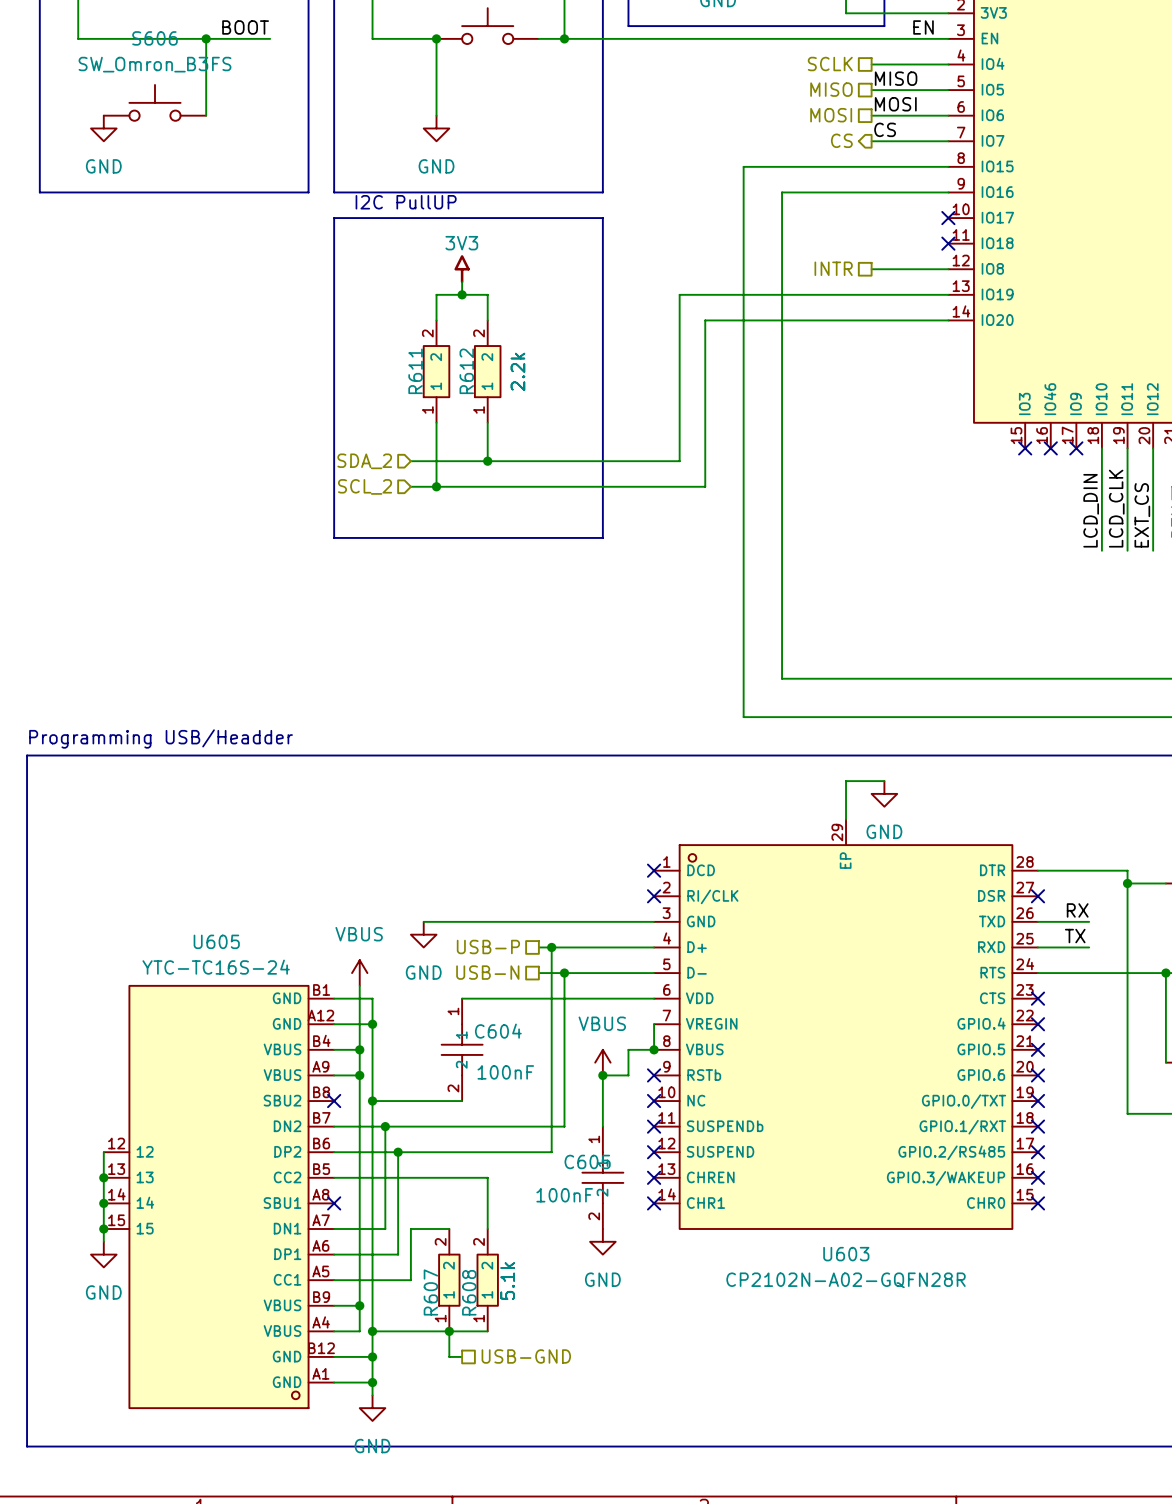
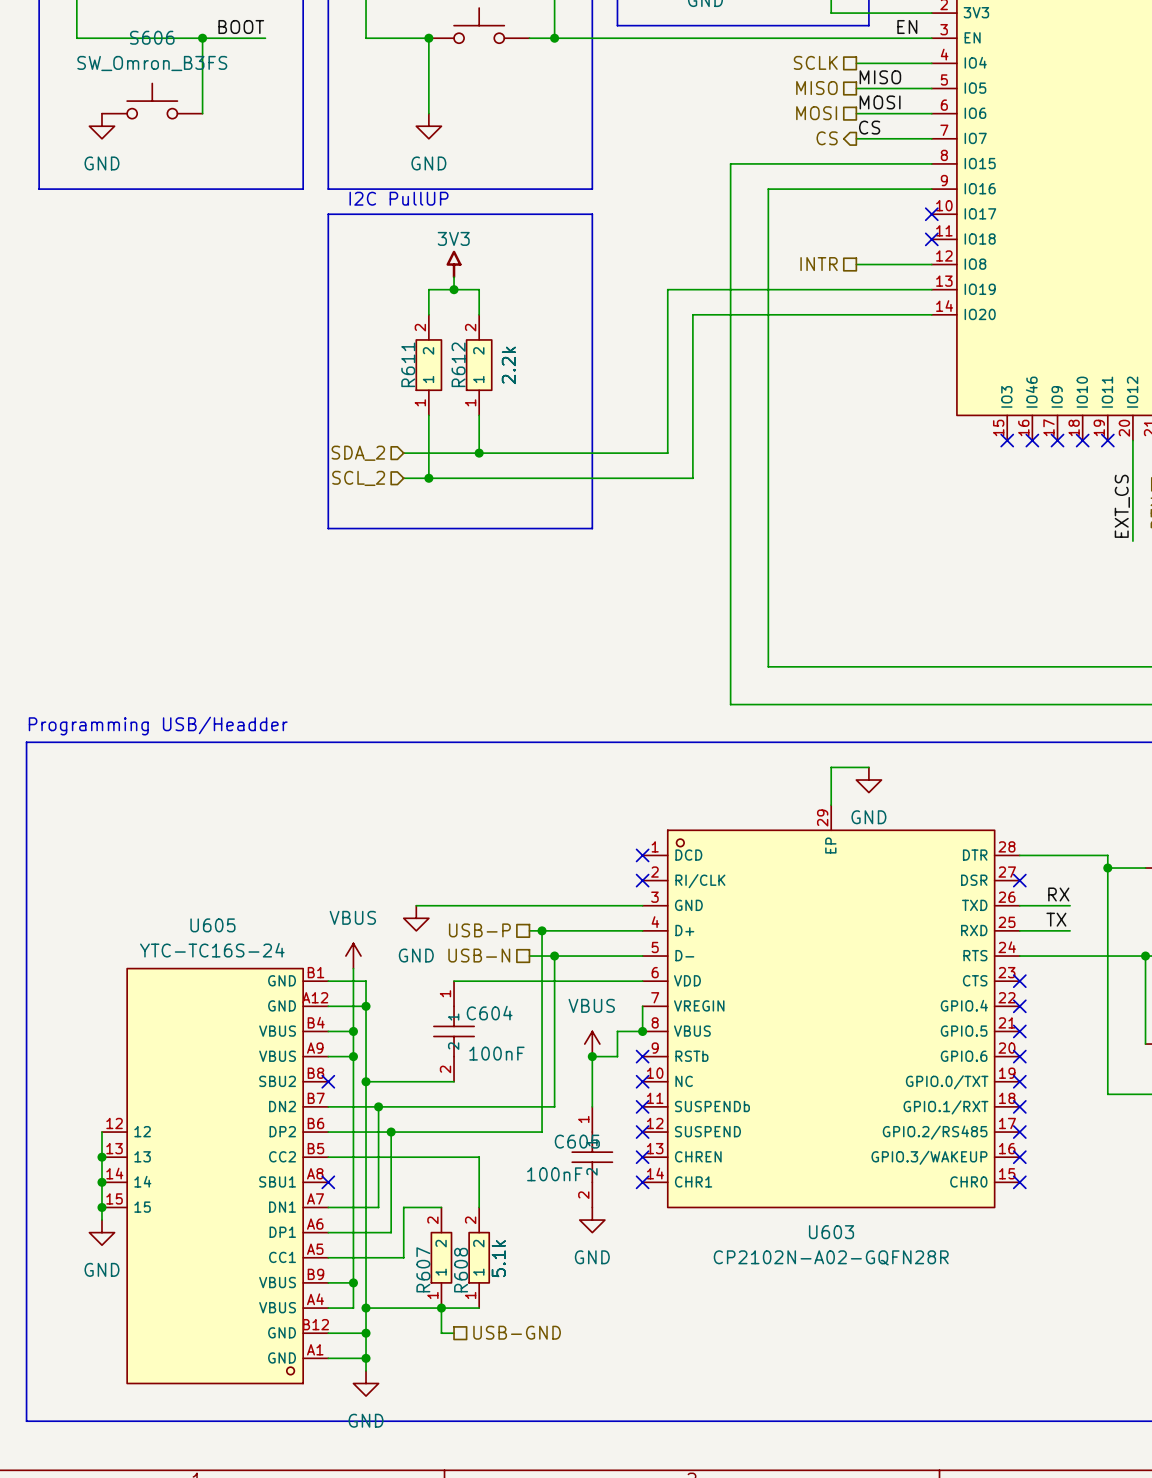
wire: (1101, 448) (1101, 550) -> none
no-connect mark: none -> (1082, 440)
wire: (1127, 448) (1127, 550) -> none
no-connect mark: none -> (1107, 440)
label: LCD_CLK (1116, 508) -> none
label: LCD_DIN (1091, 510) -> none

